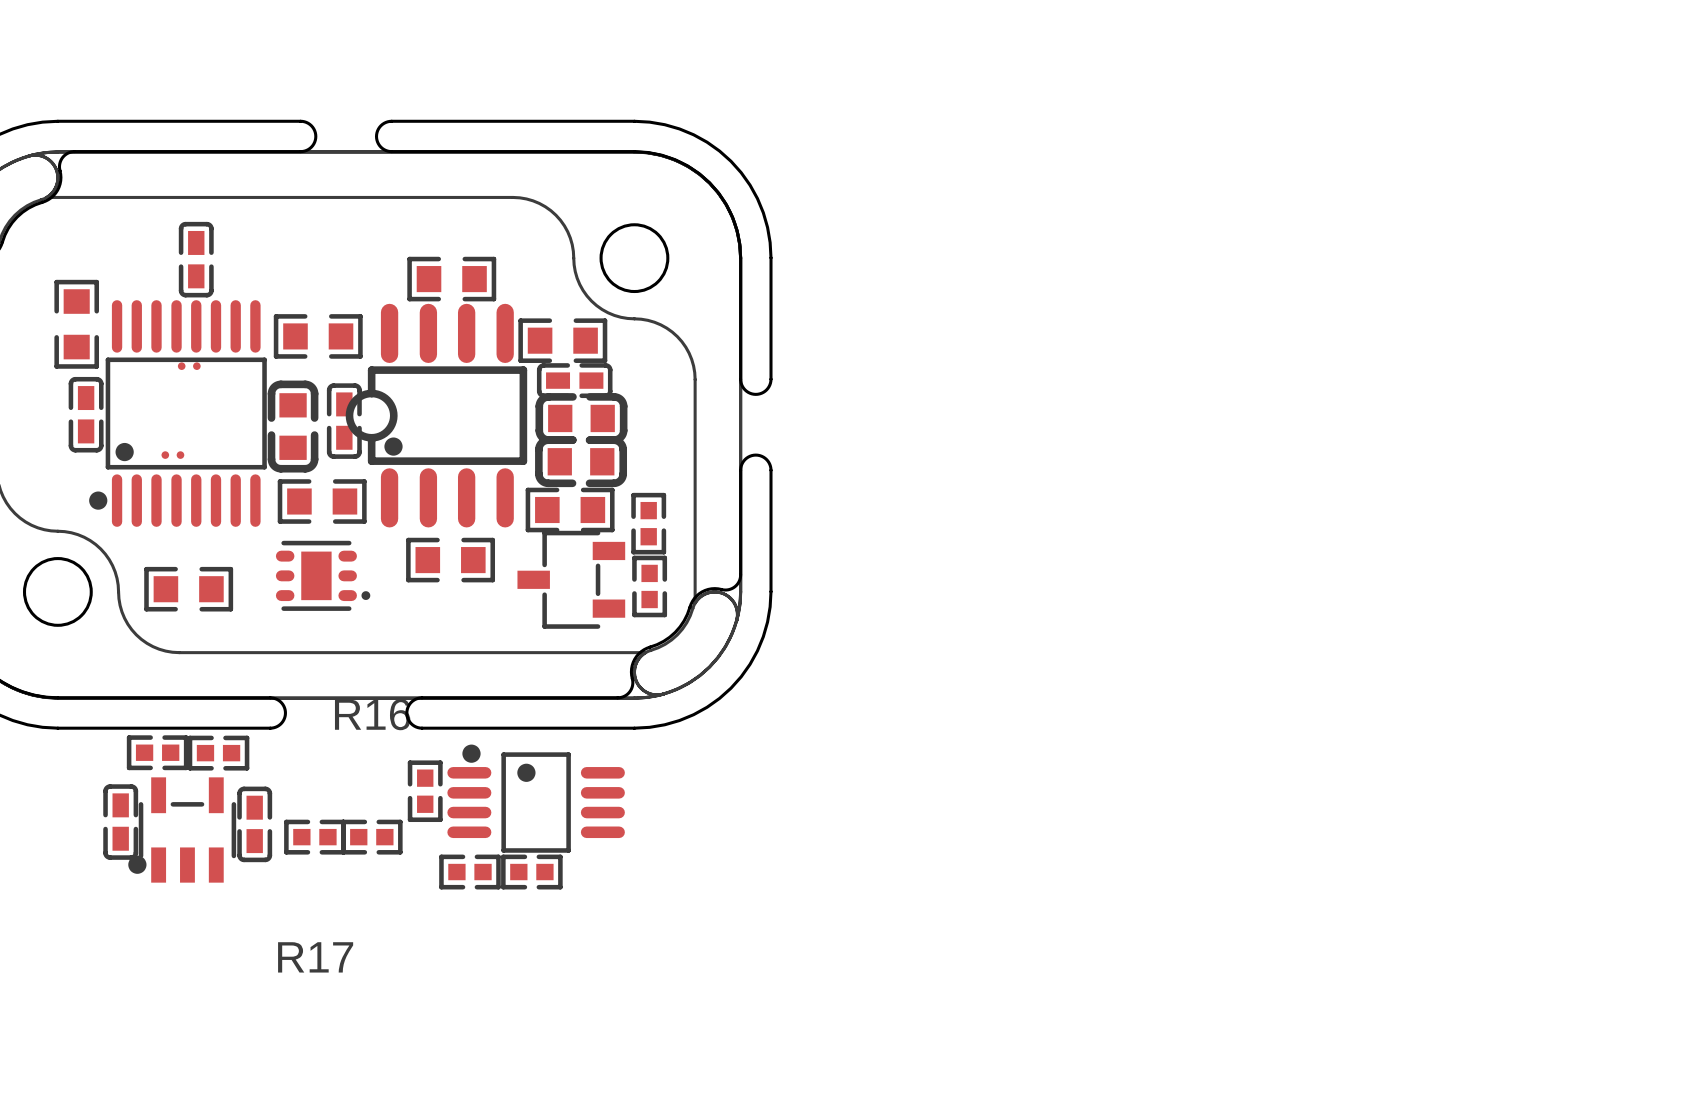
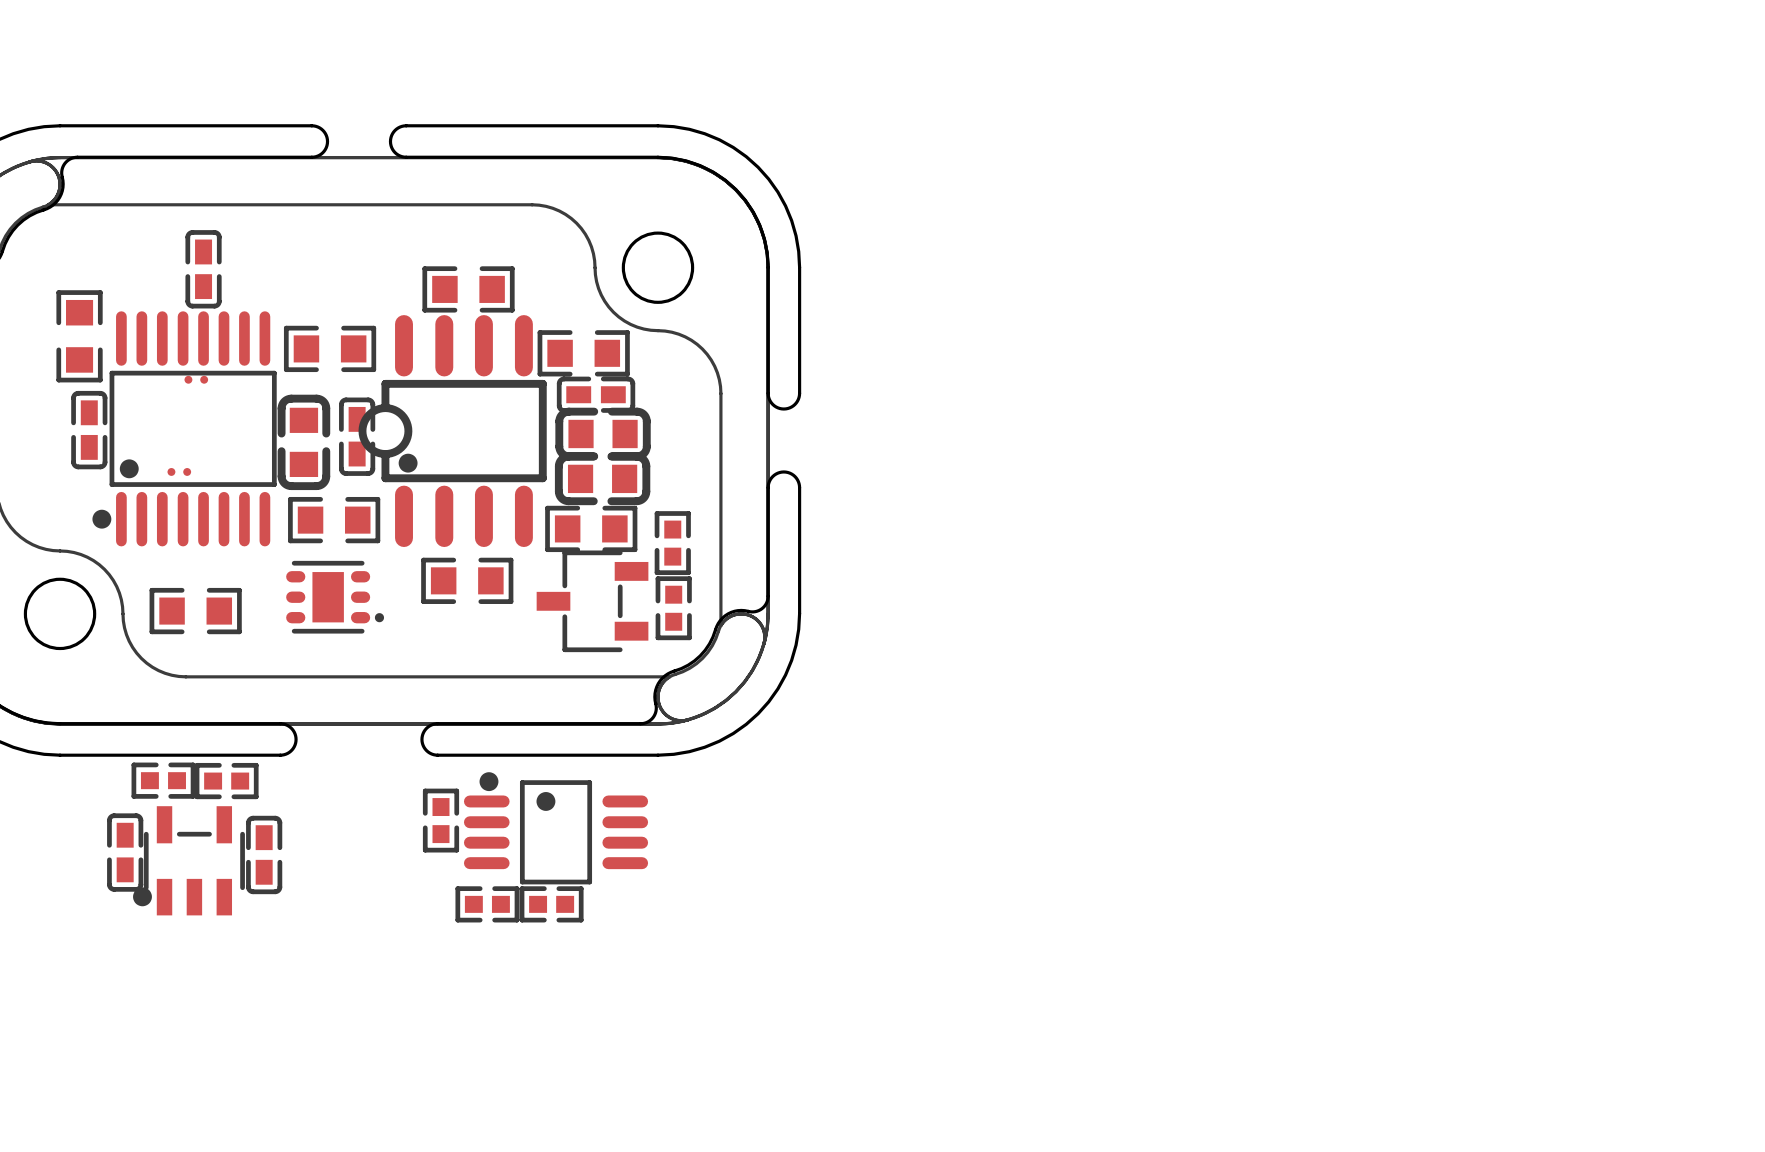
R17: (314, 837) -> none
R16: (371, 837) -> none

